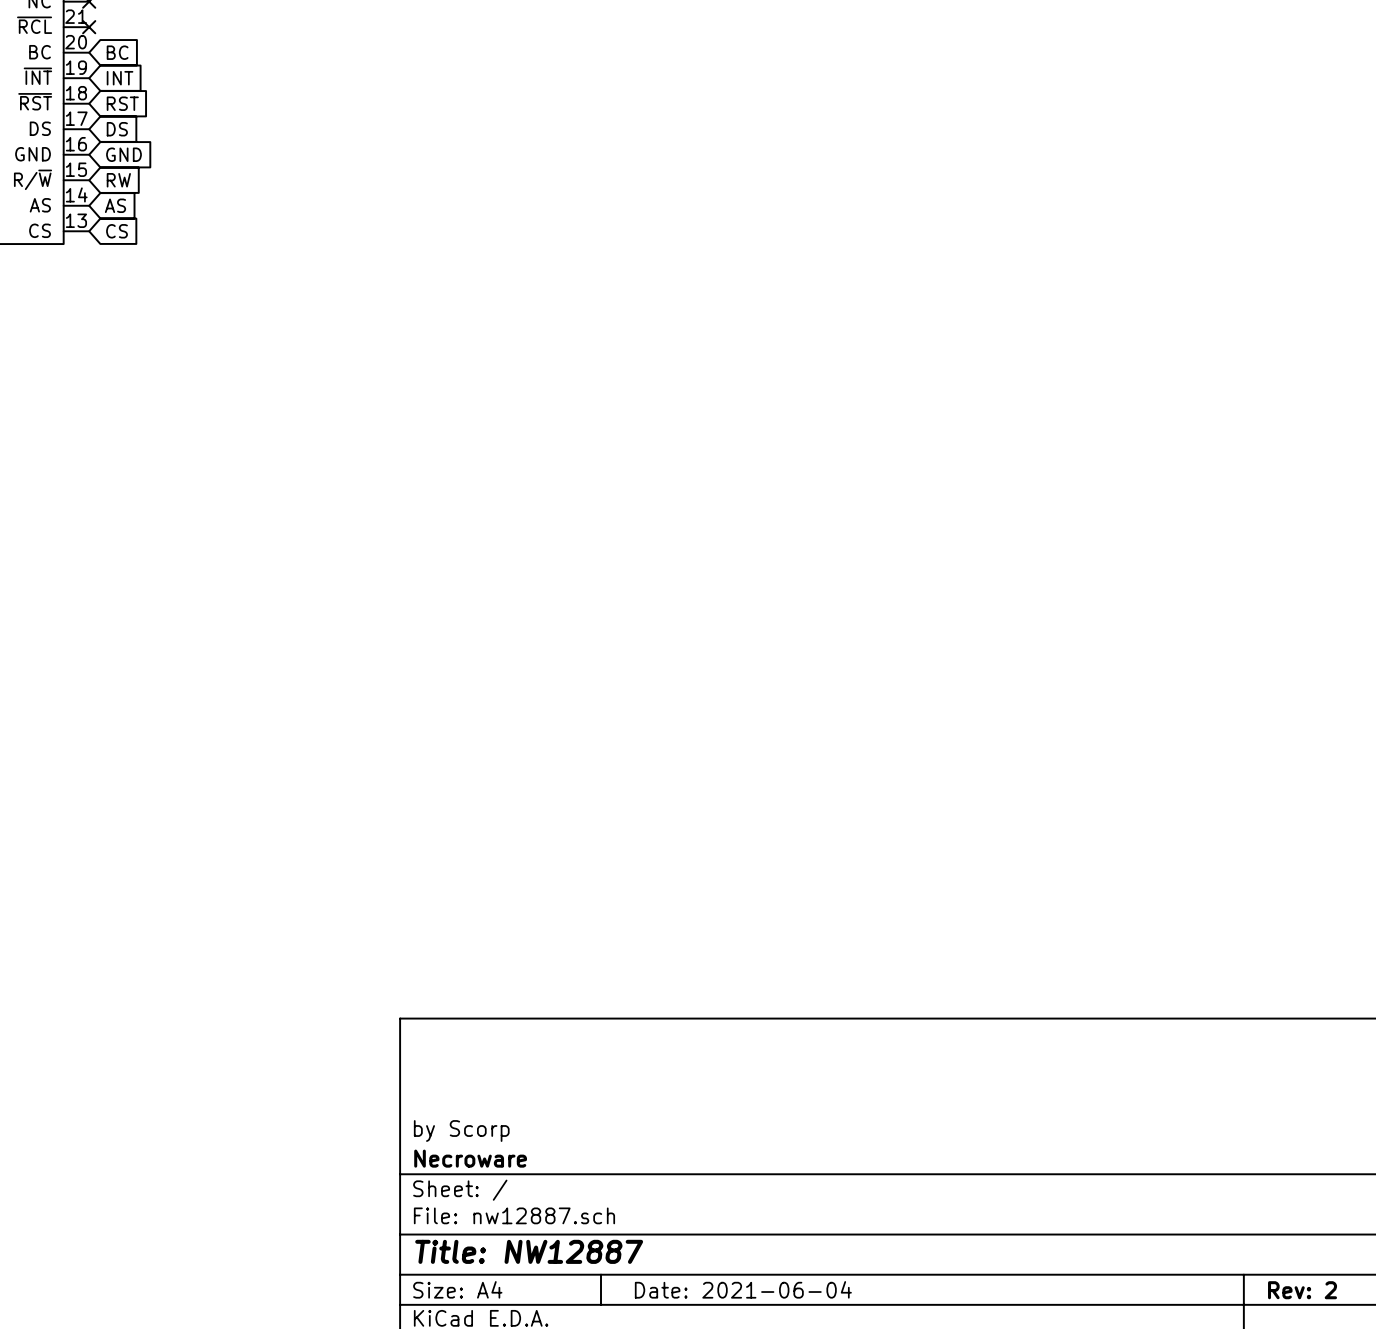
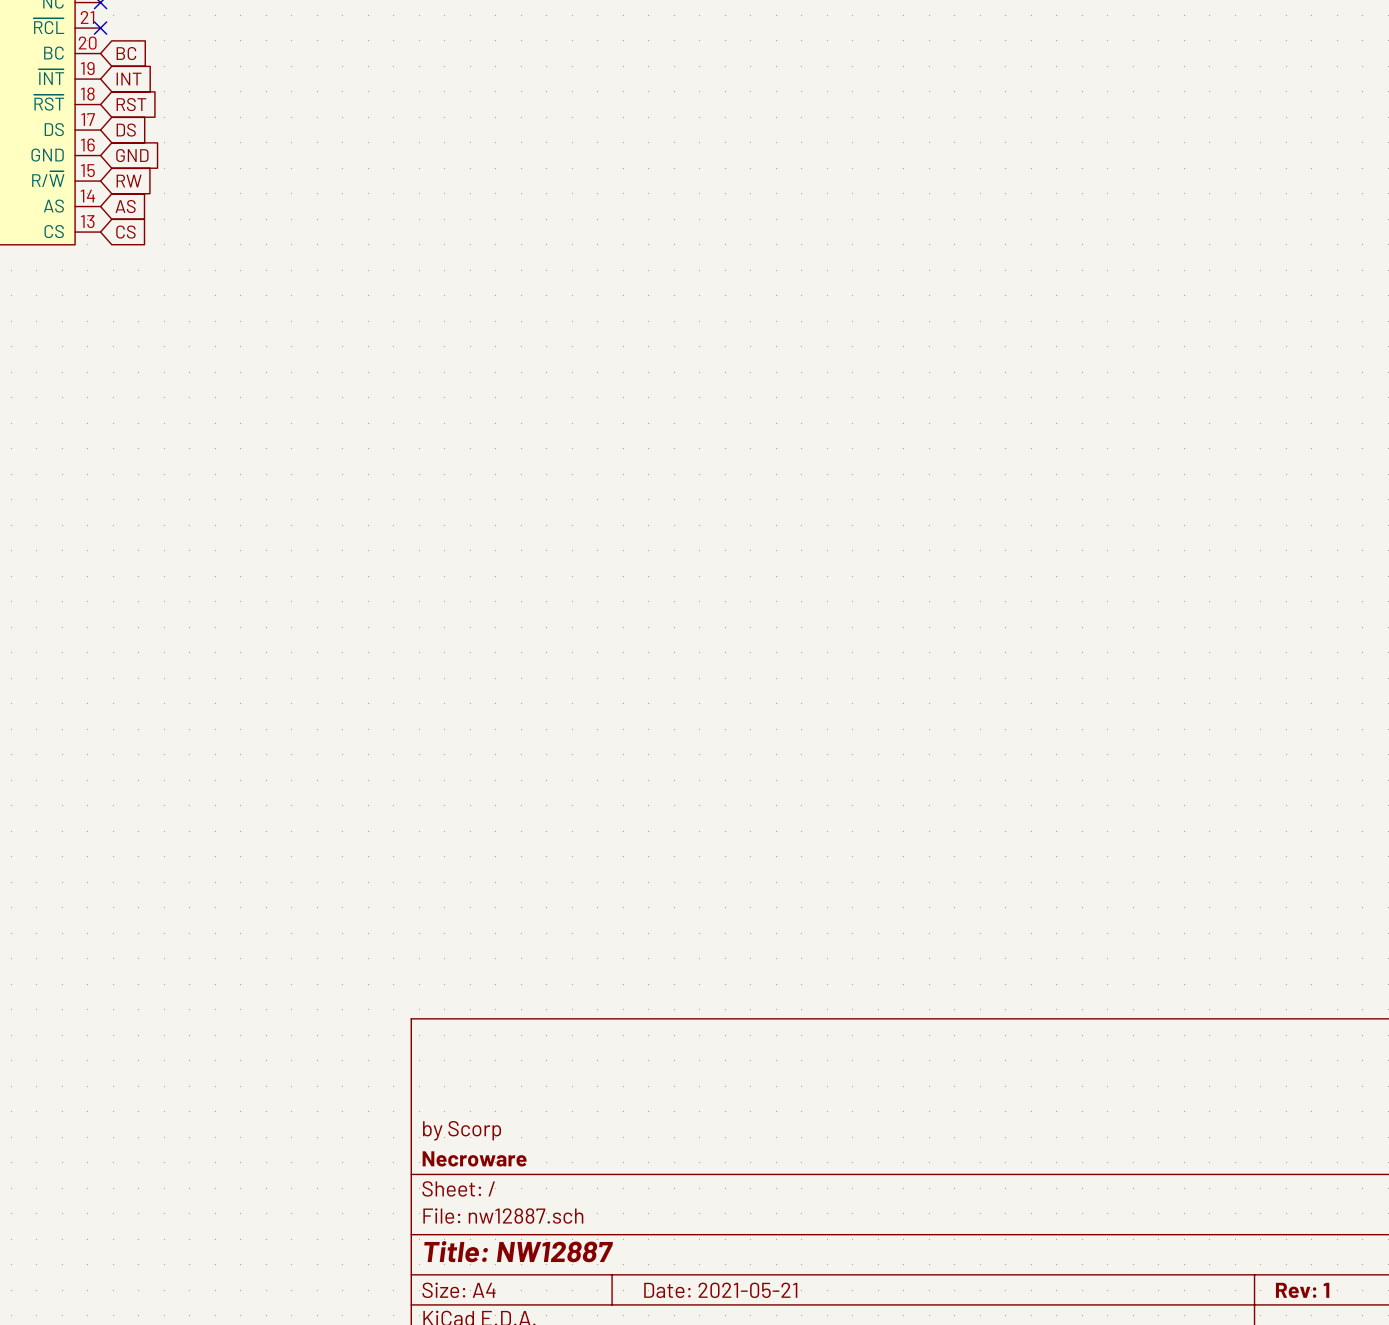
title block: Date: 2021-06-04 (743, 1289) -> Date: 2021-05-21 (720, 1290)
title block: Rev: 2 (1302, 1290) -> Rev: 1 (1302, 1290)

